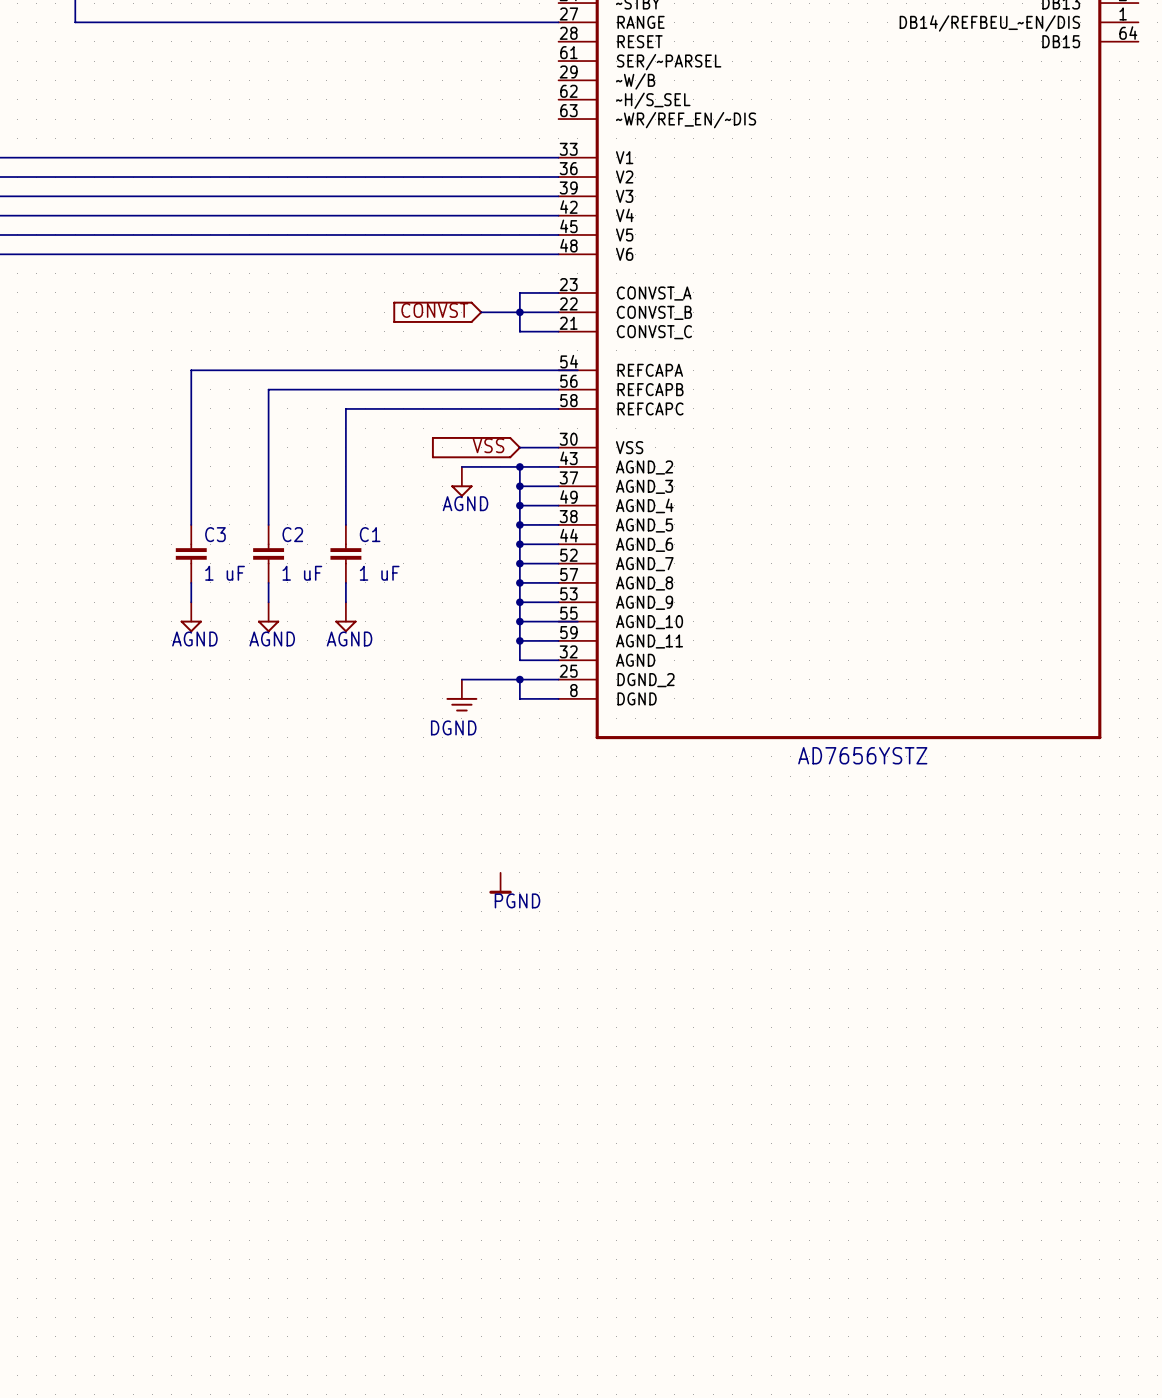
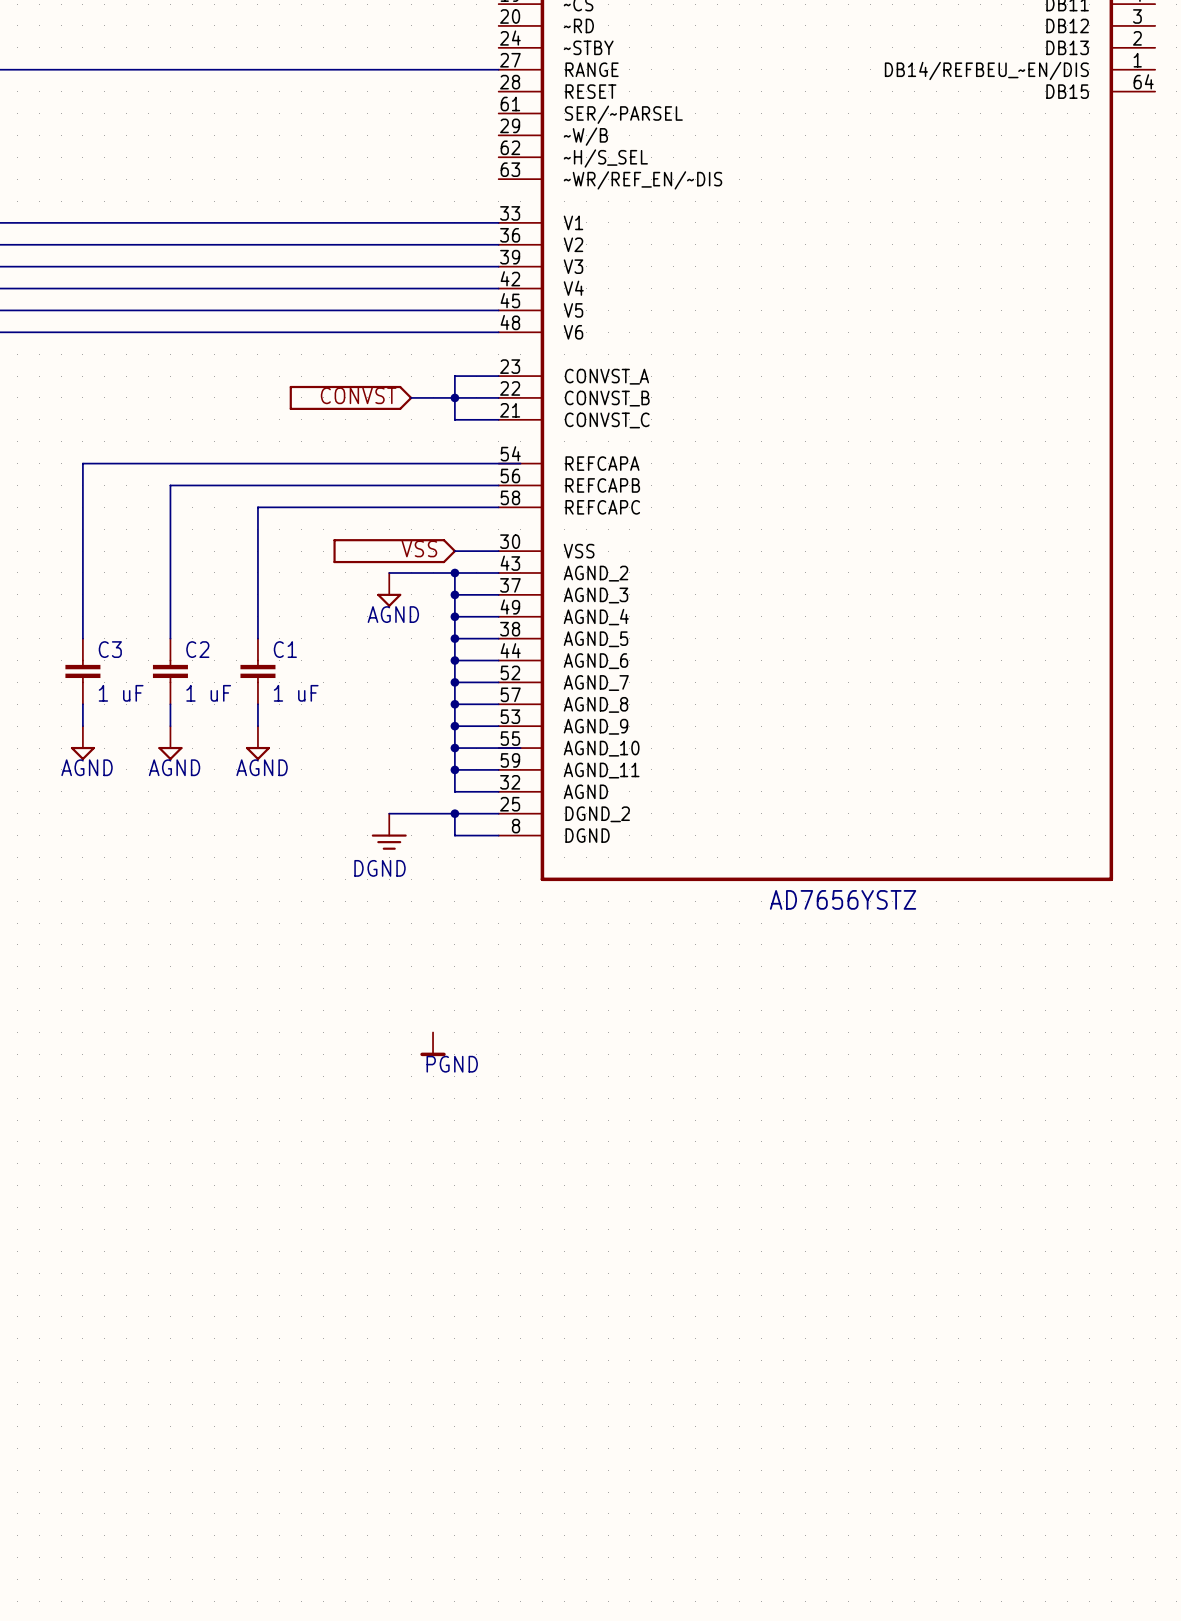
part: none -> (350, 397)
part: (437, 312) -> none
part: none -> (394, 551)
part: (476, 447) -> none

